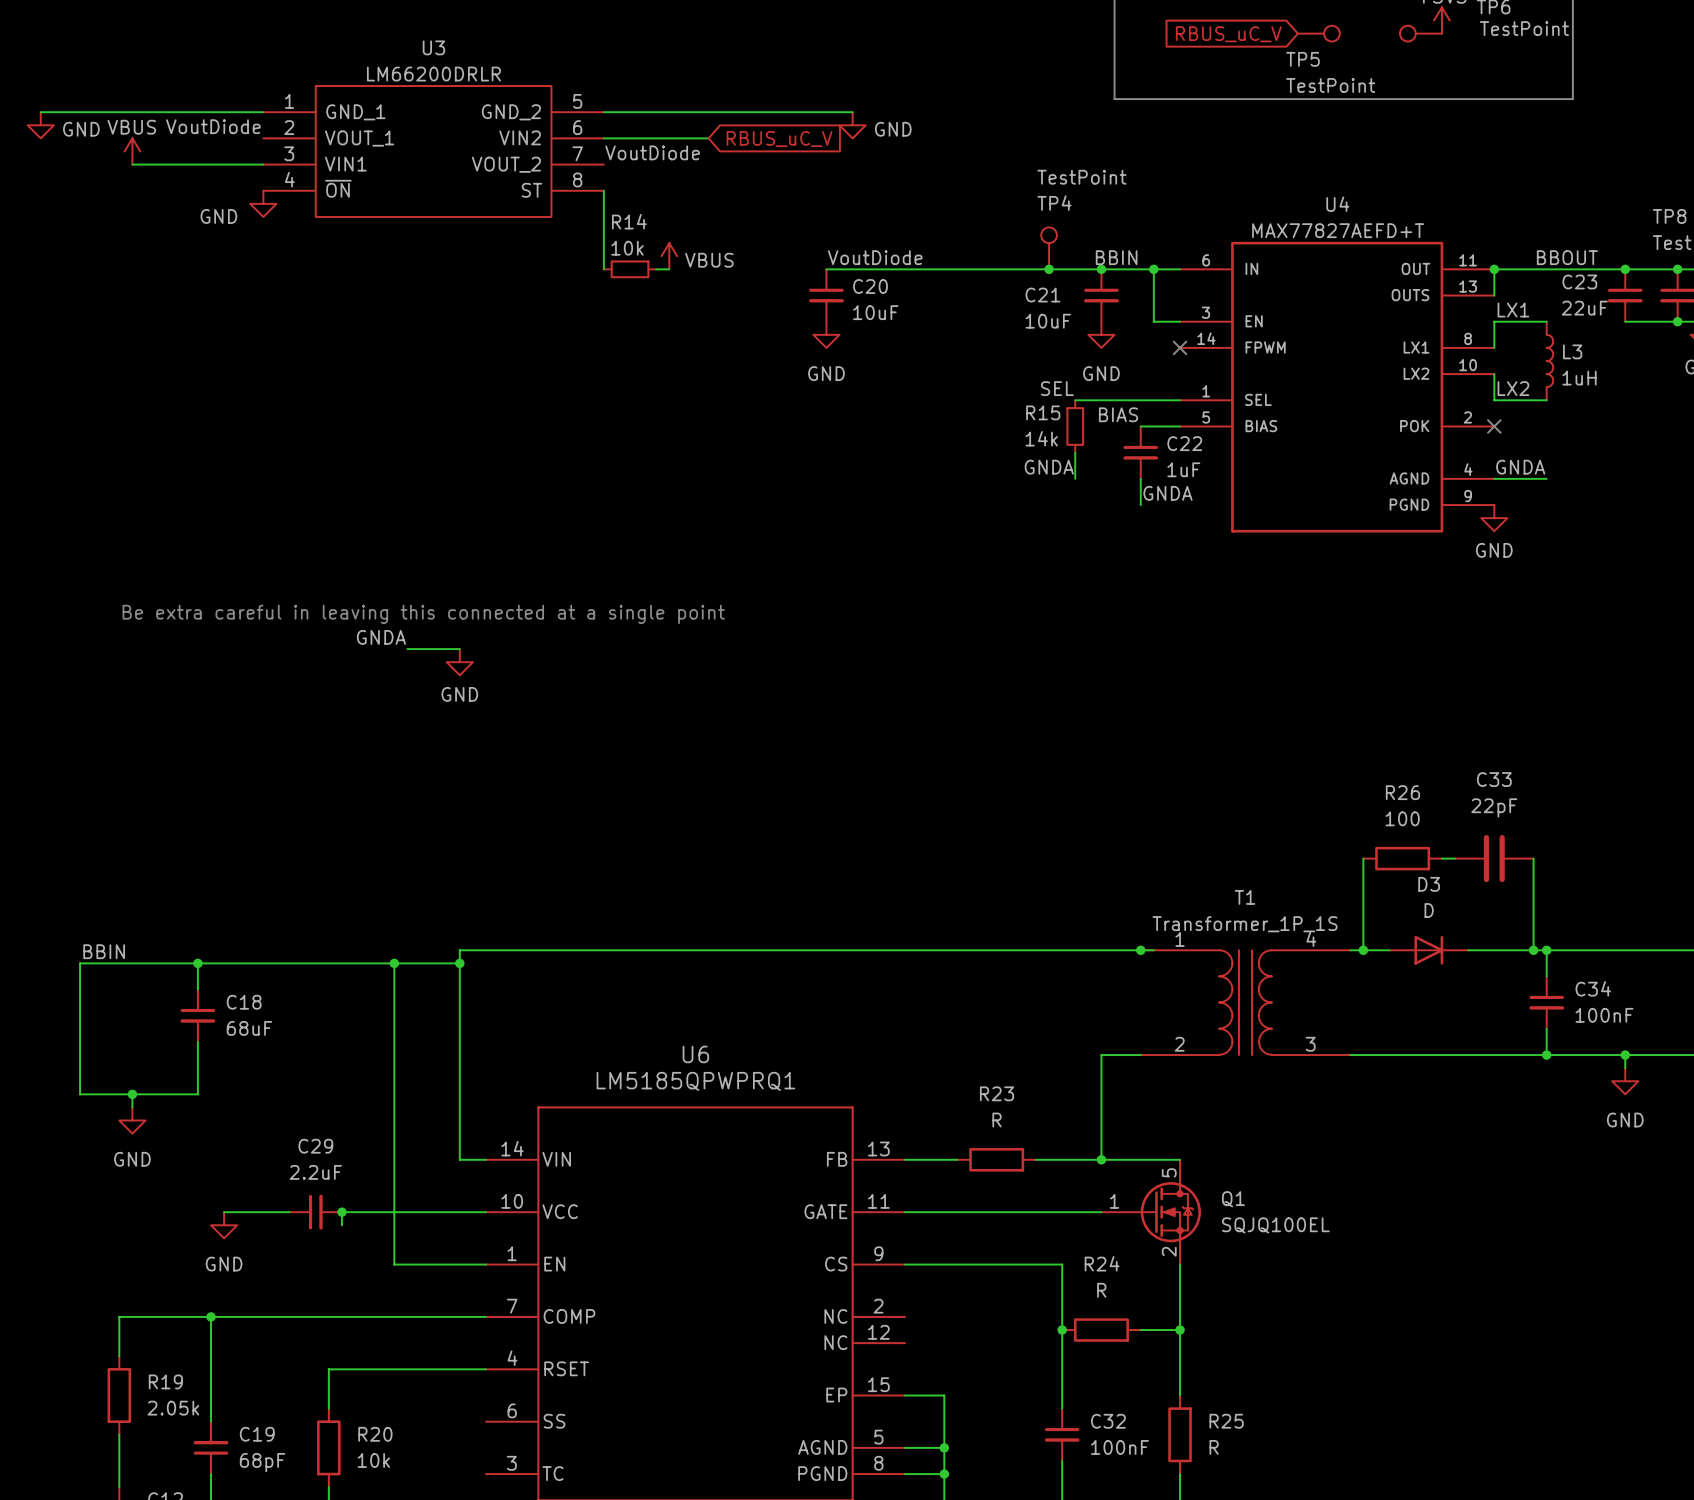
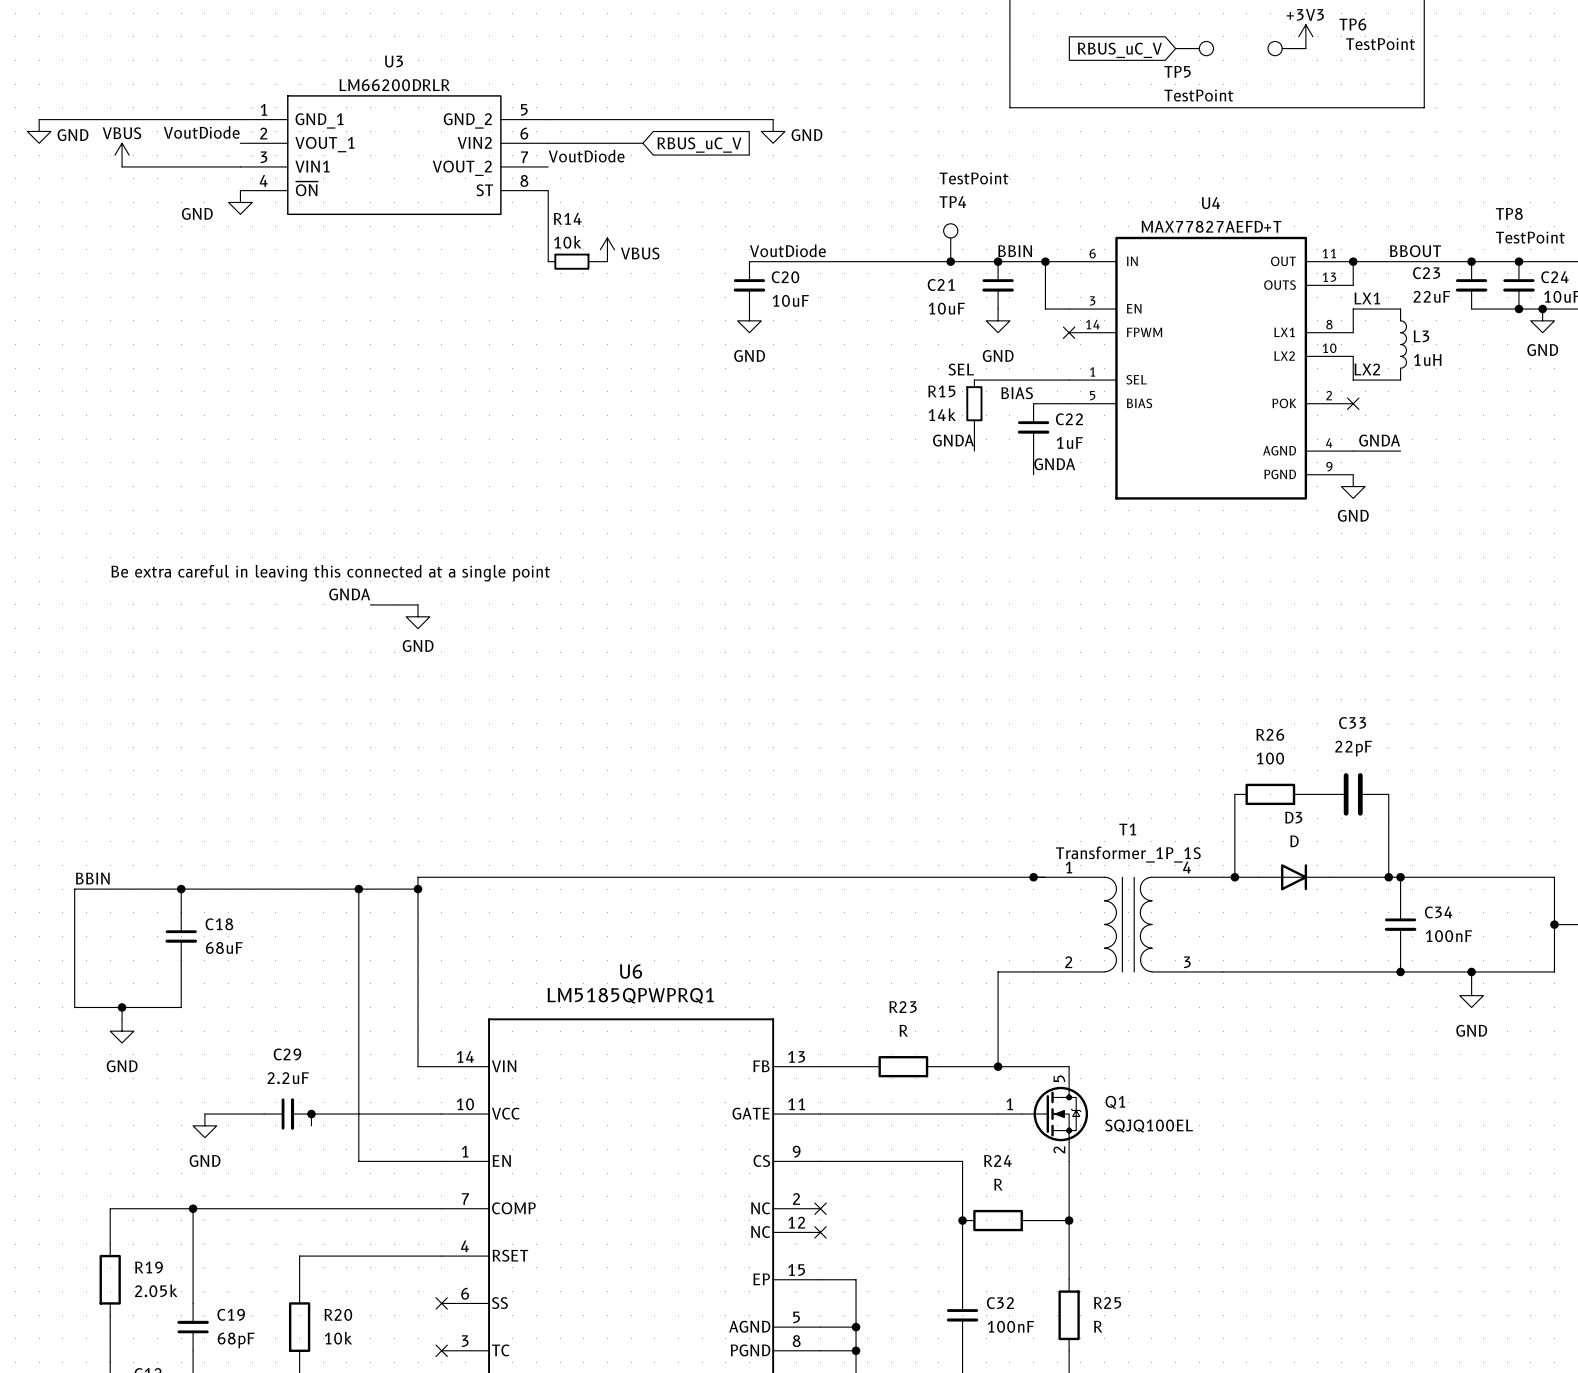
no-connect mark: none -> (820, 1208)
no-connect mark: none -> (820, 1232)
no-connect mark: none -> (441, 1303)
no-connect mark: none -> (441, 1350)

